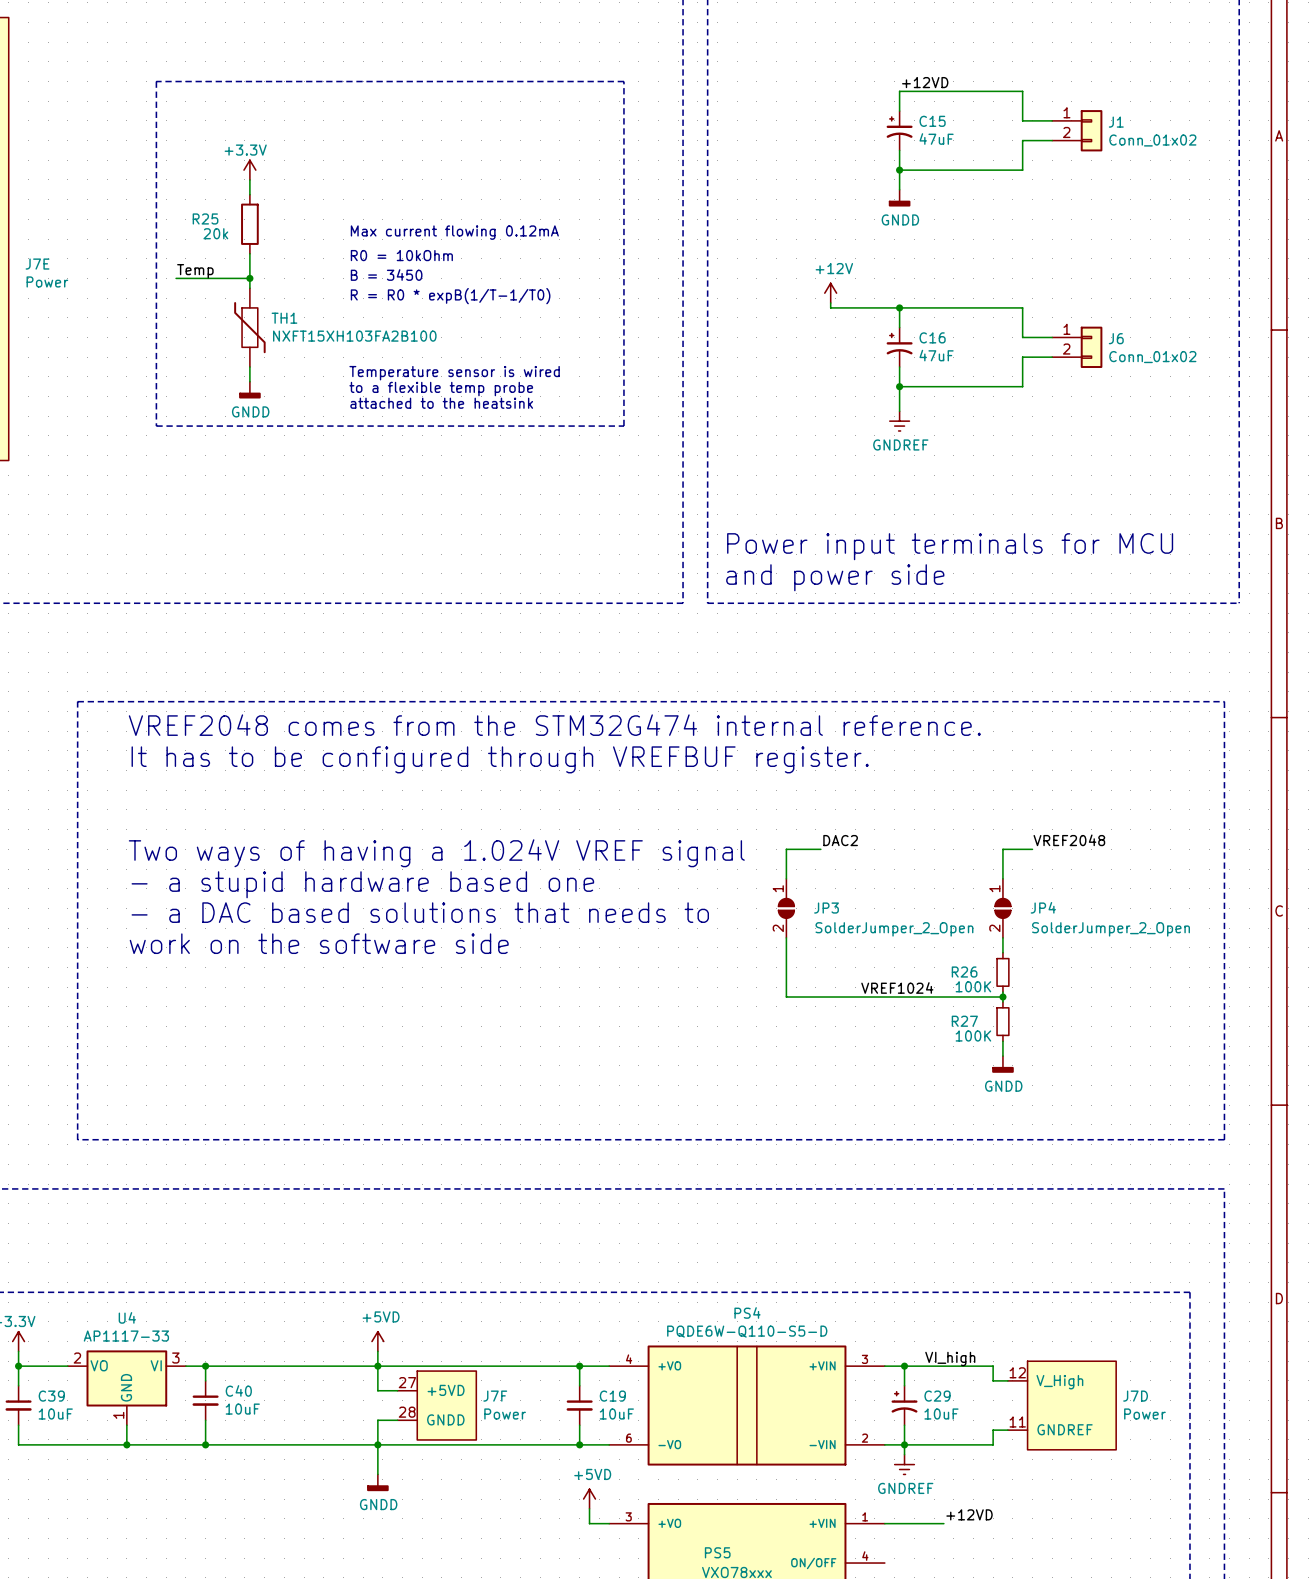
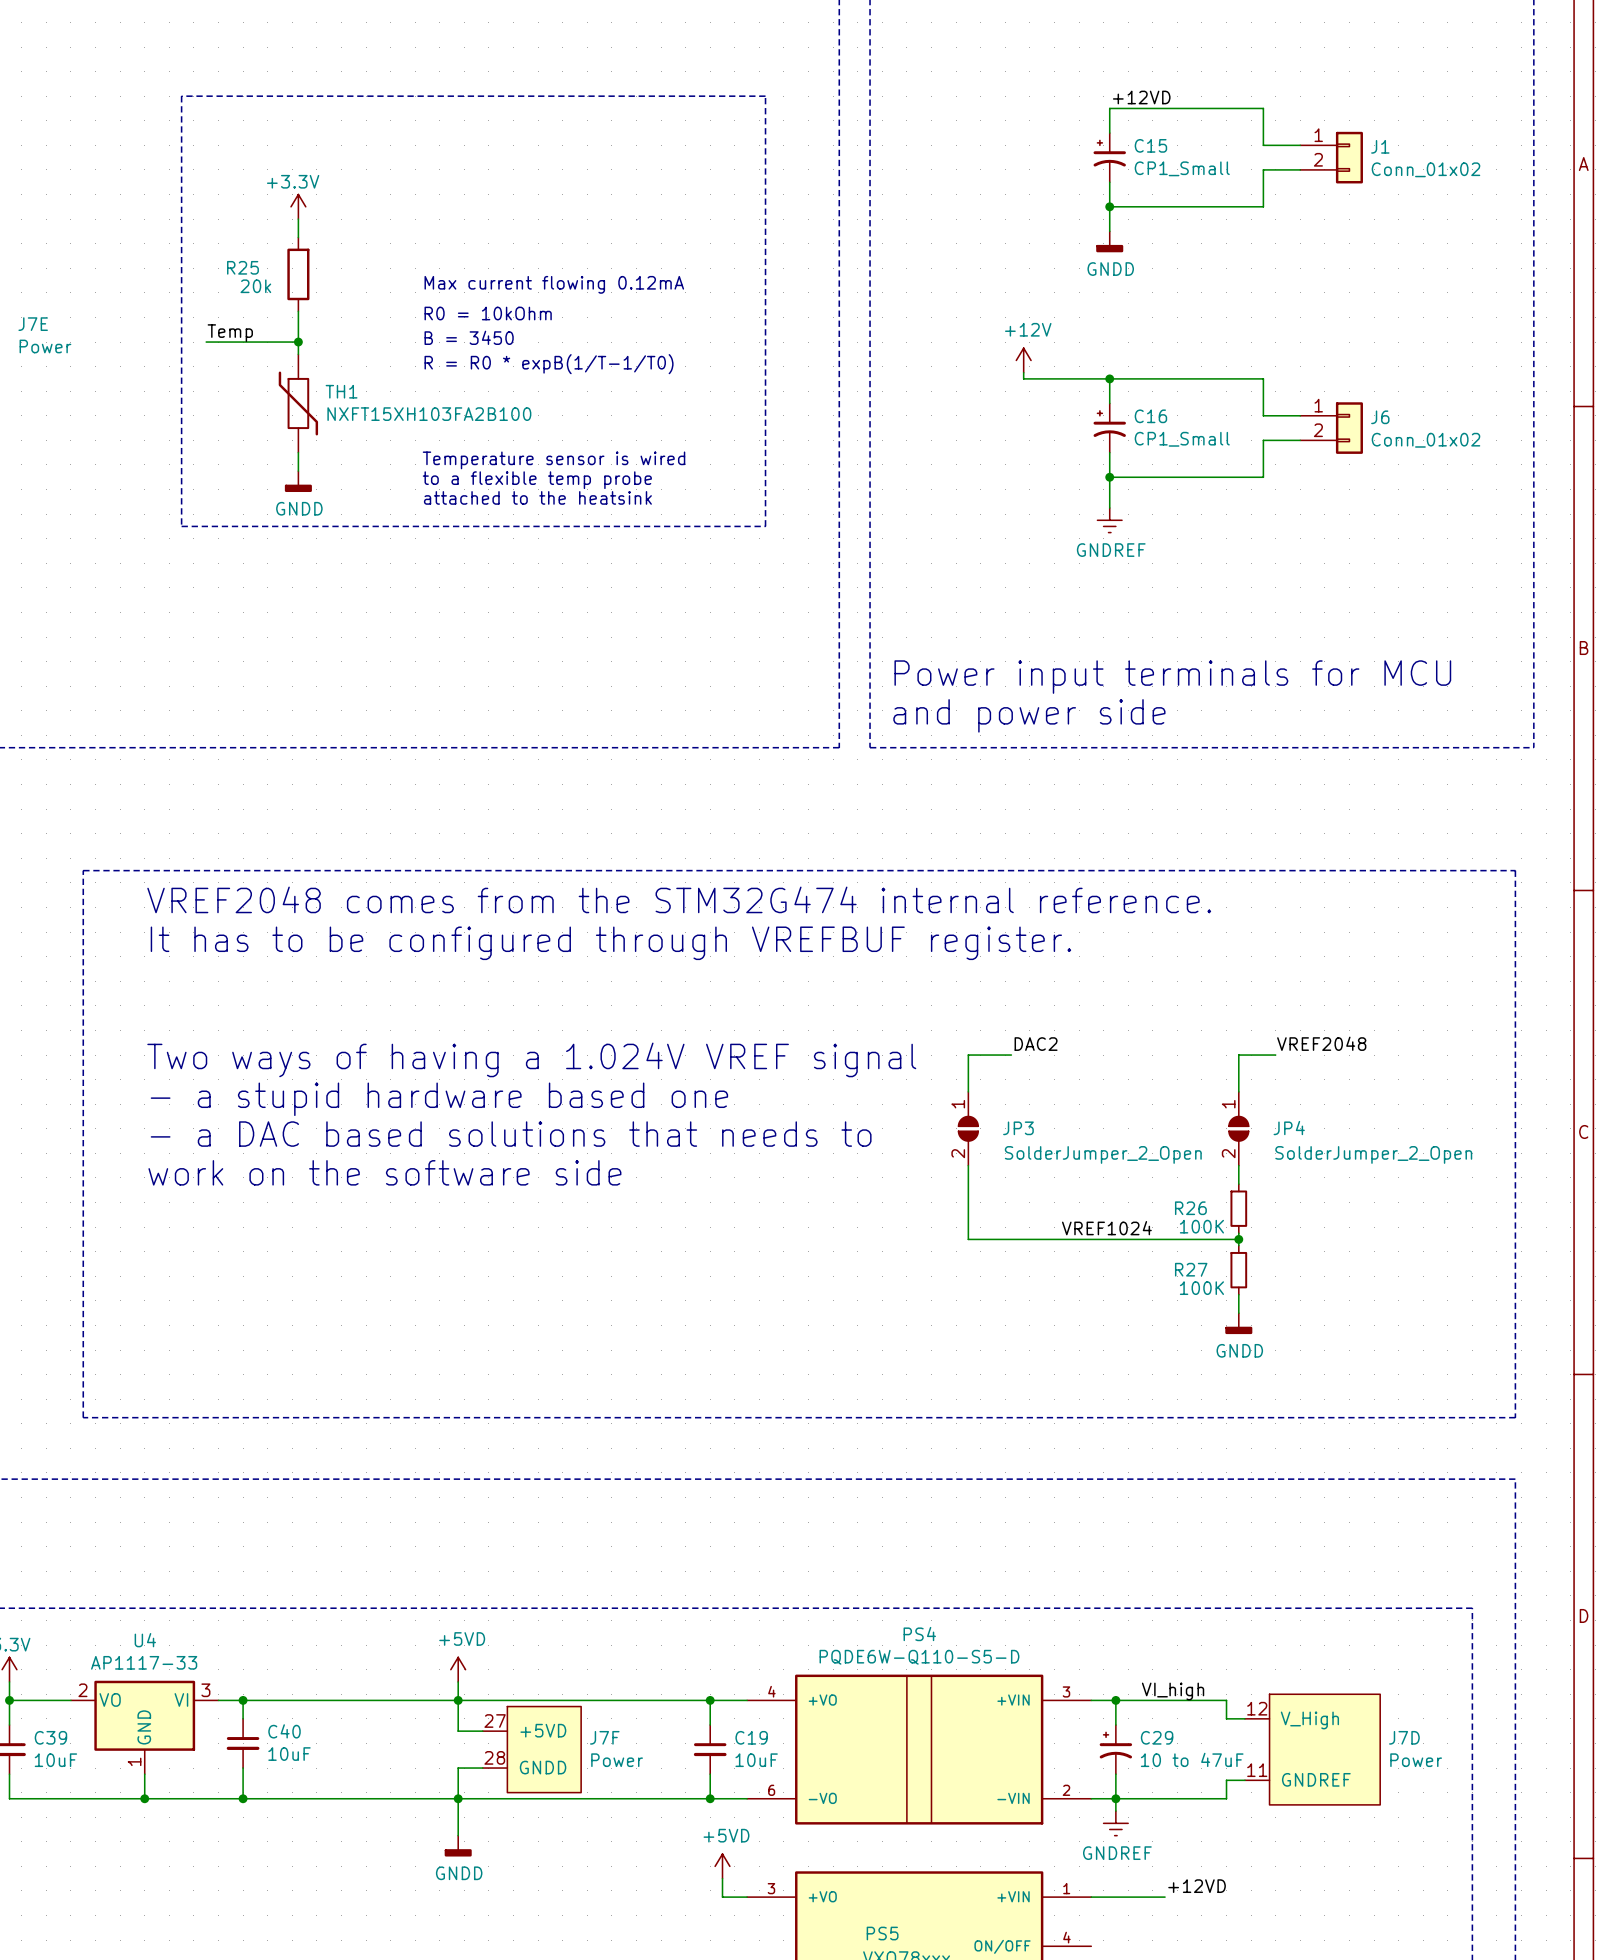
C15 value: 47uF (936, 139) -> CP1_Small (1182, 168)
C16 value: 47uF (936, 355) -> CP1_Small (1182, 439)
C29 value: 10uF (941, 1414) -> 10 to 47uF (1192, 1759)

